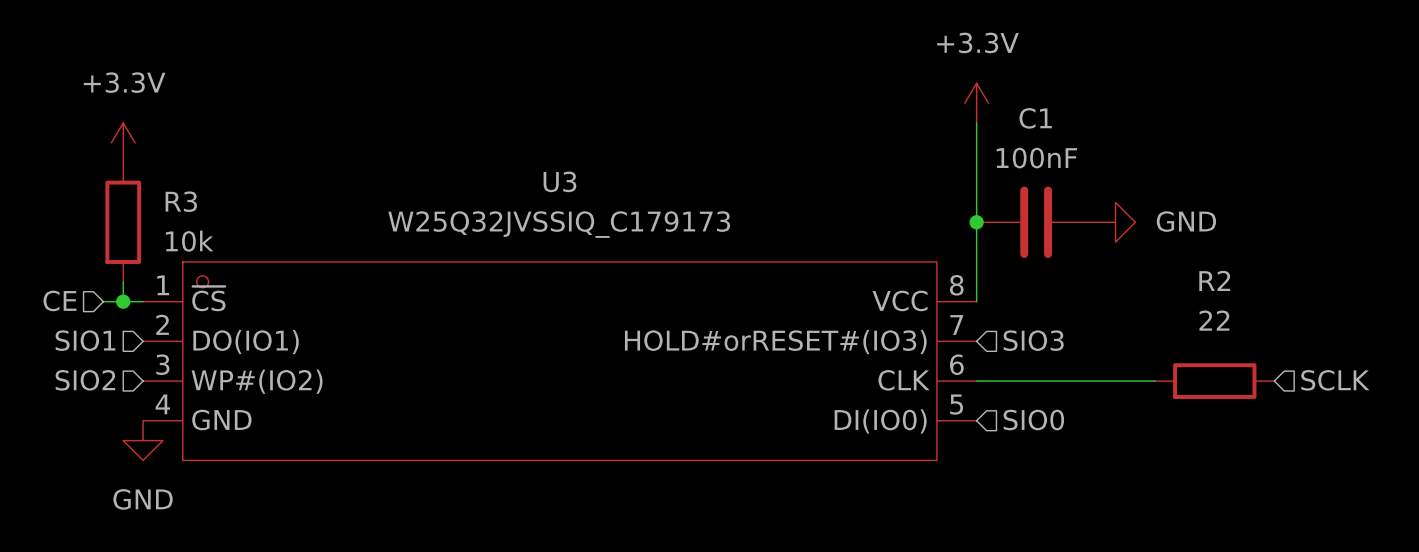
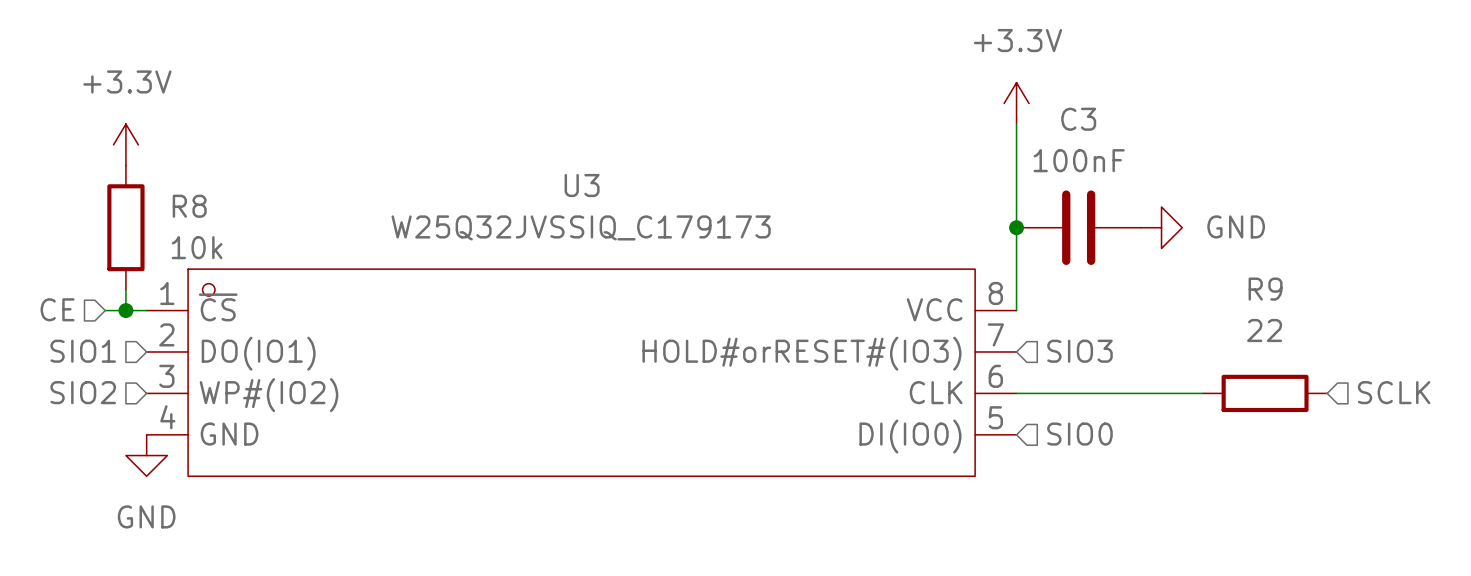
C1 name: C1 (1035, 118) -> C3 (1078, 119)
R3 name: R3 (181, 201) -> R8 (189, 206)
R2 name: R2 (1214, 280) -> R9 (1265, 289)

